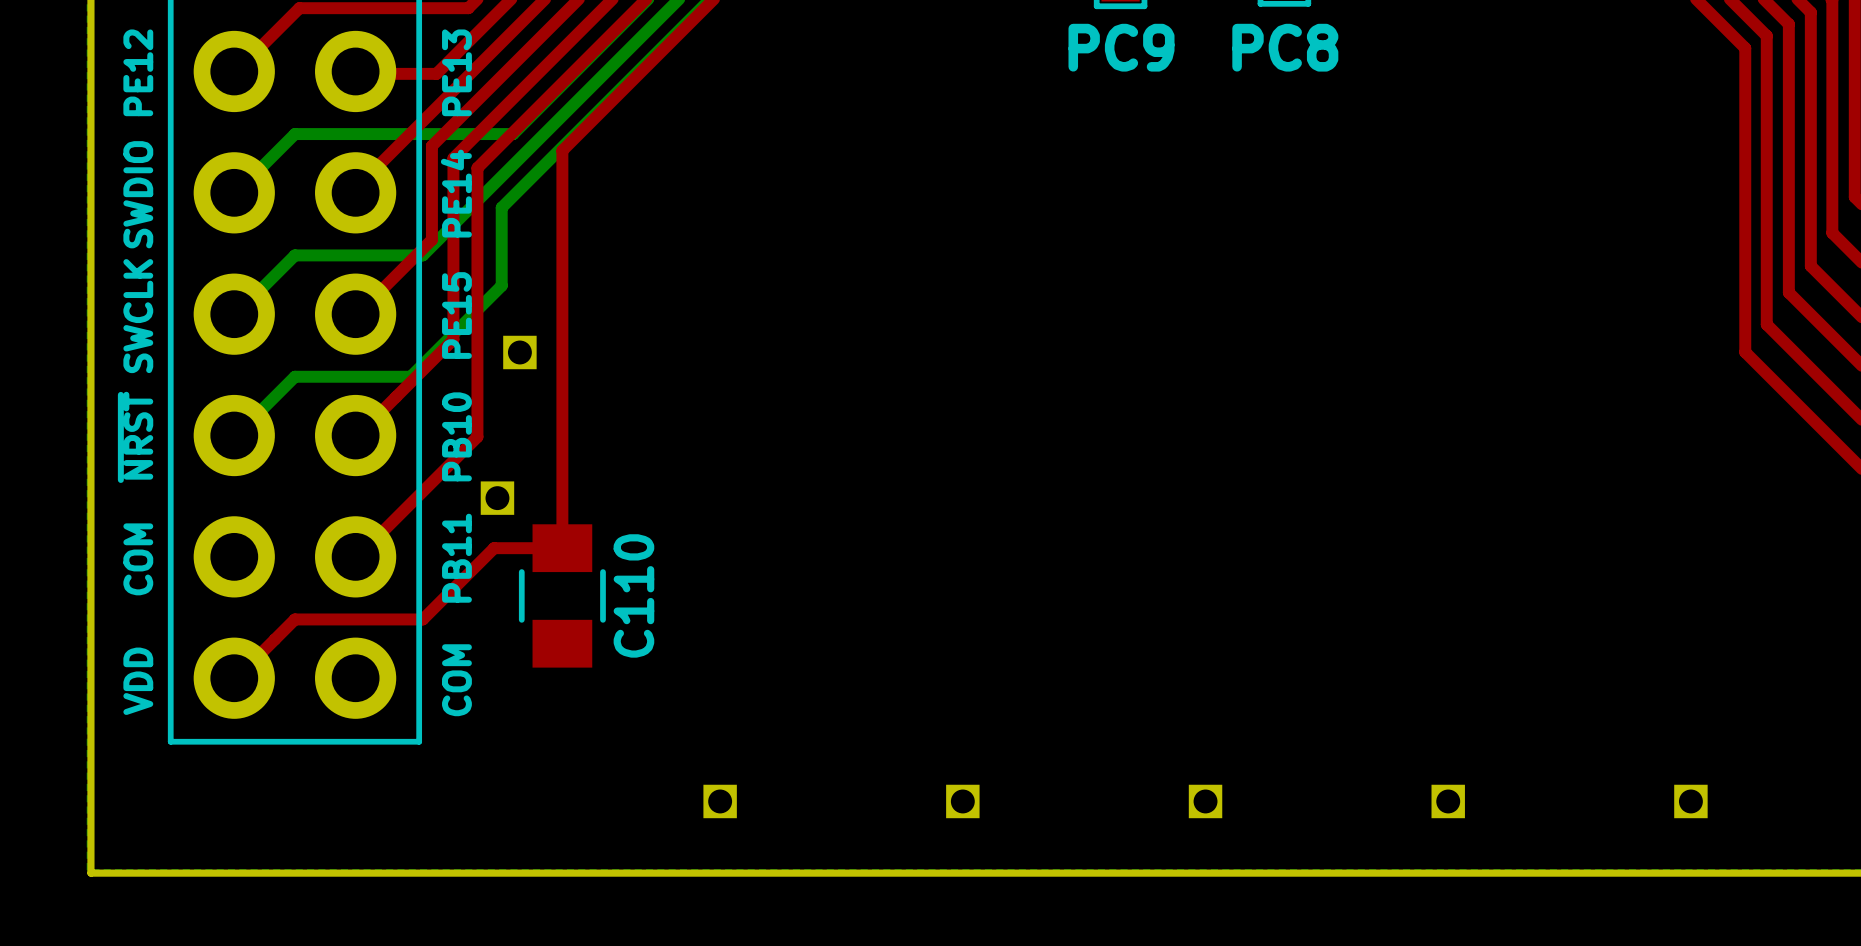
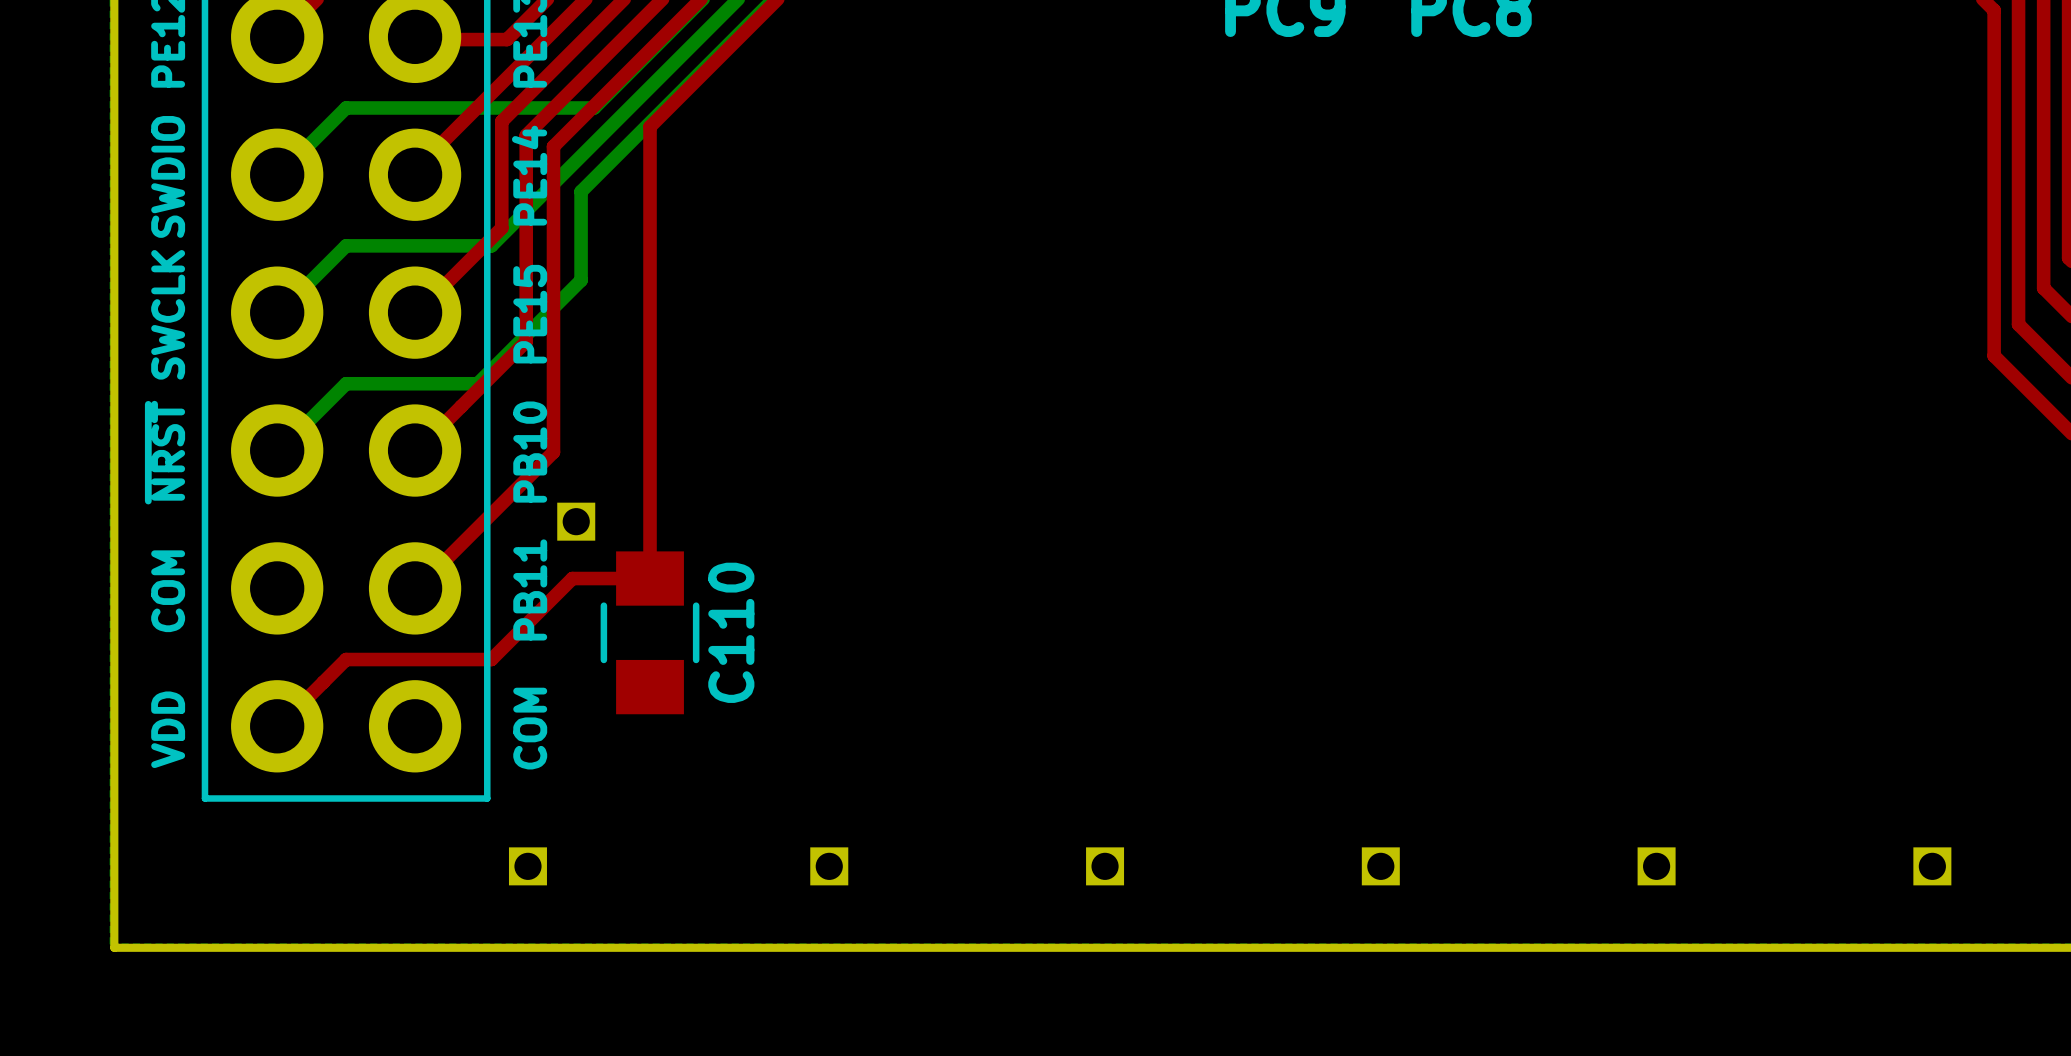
part position: (519, 352) -> (527, 866)

